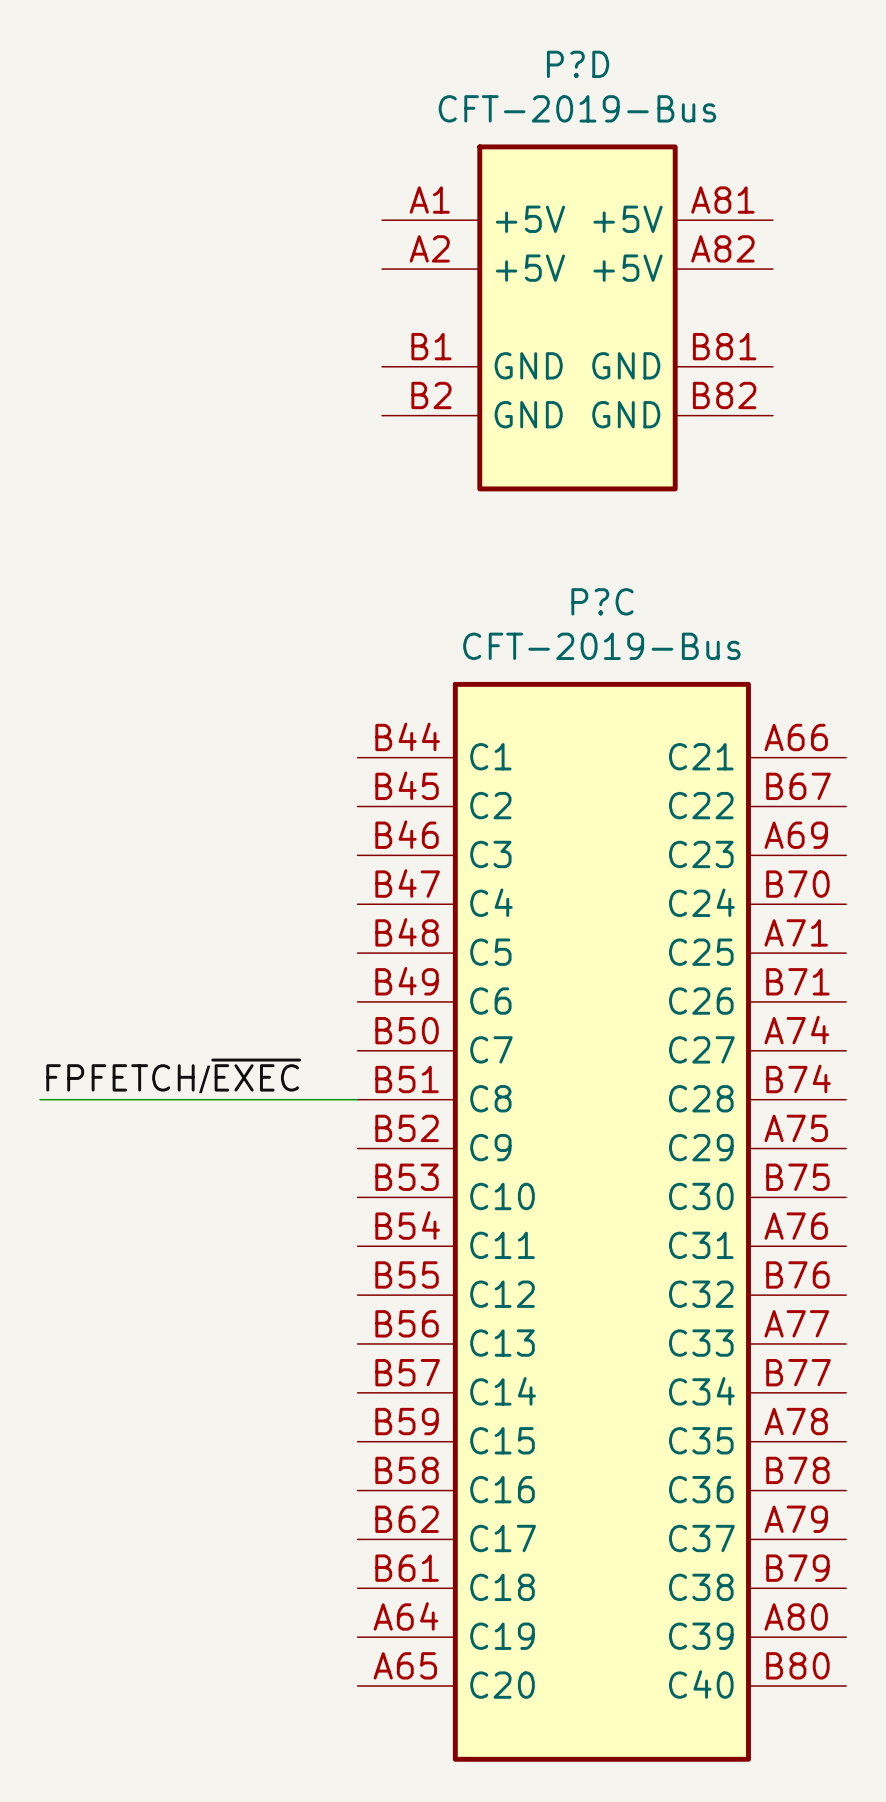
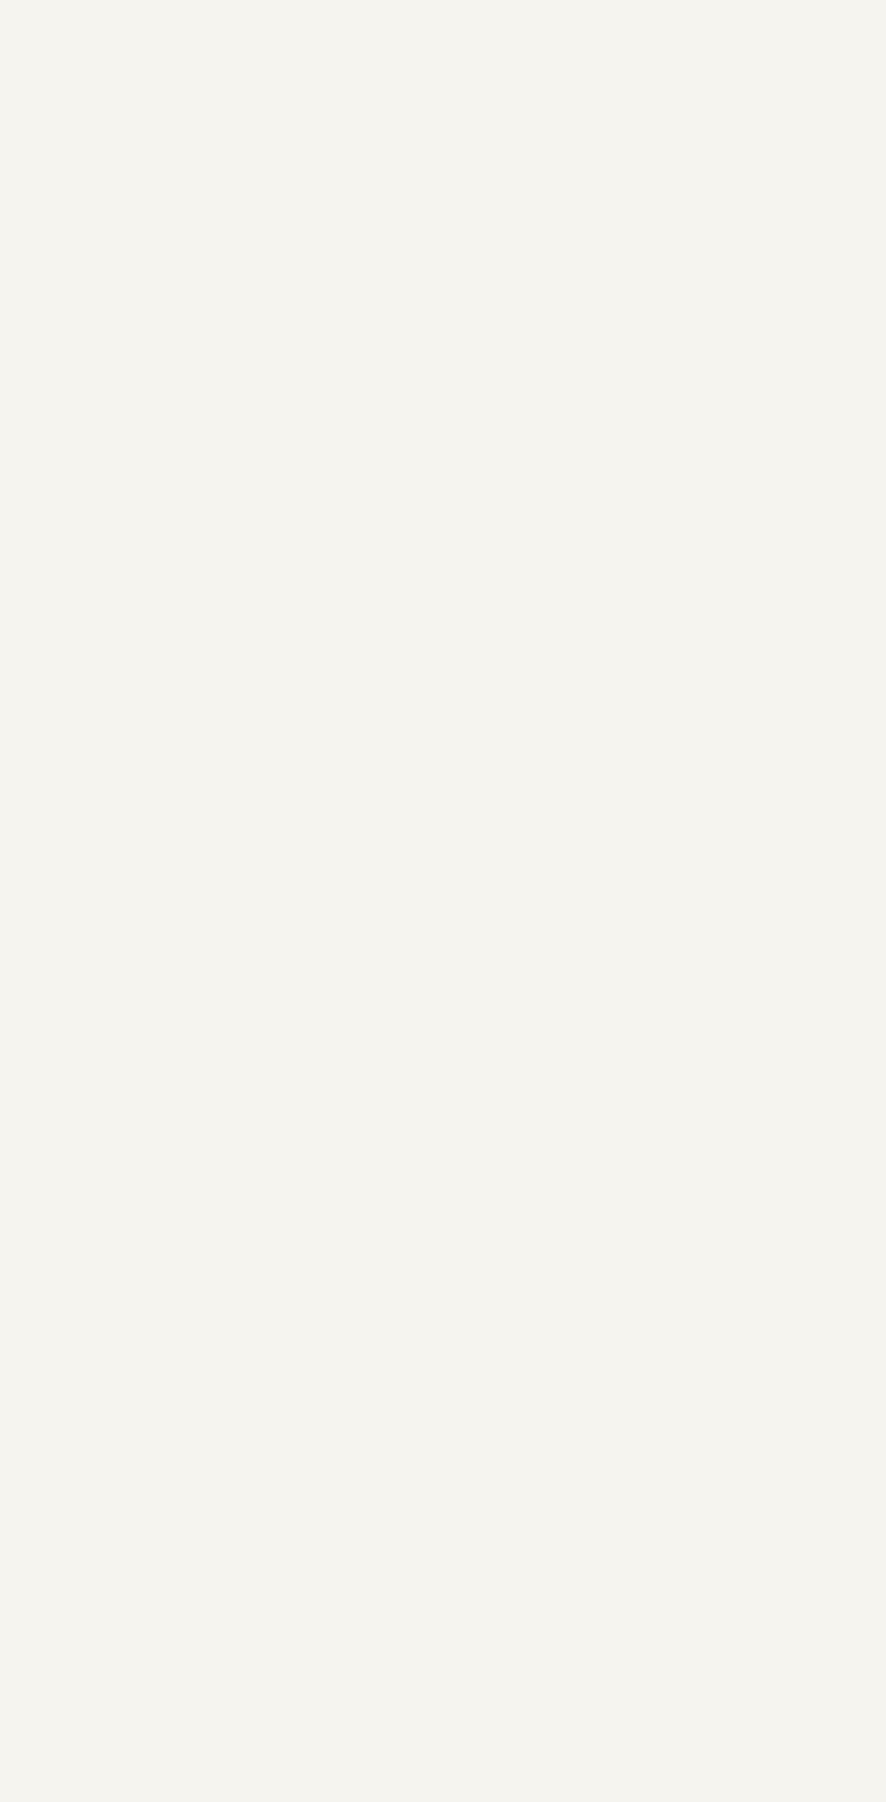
P?D: CFT-2019-Bus (577, 317) -> none
label: FPFETCH∕~{EXEC} (173, 1076) -> none
wire: (40, 1099) (357, 1099) -> none
P?C: CFT-2019-Bus (601, 1221) -> none

